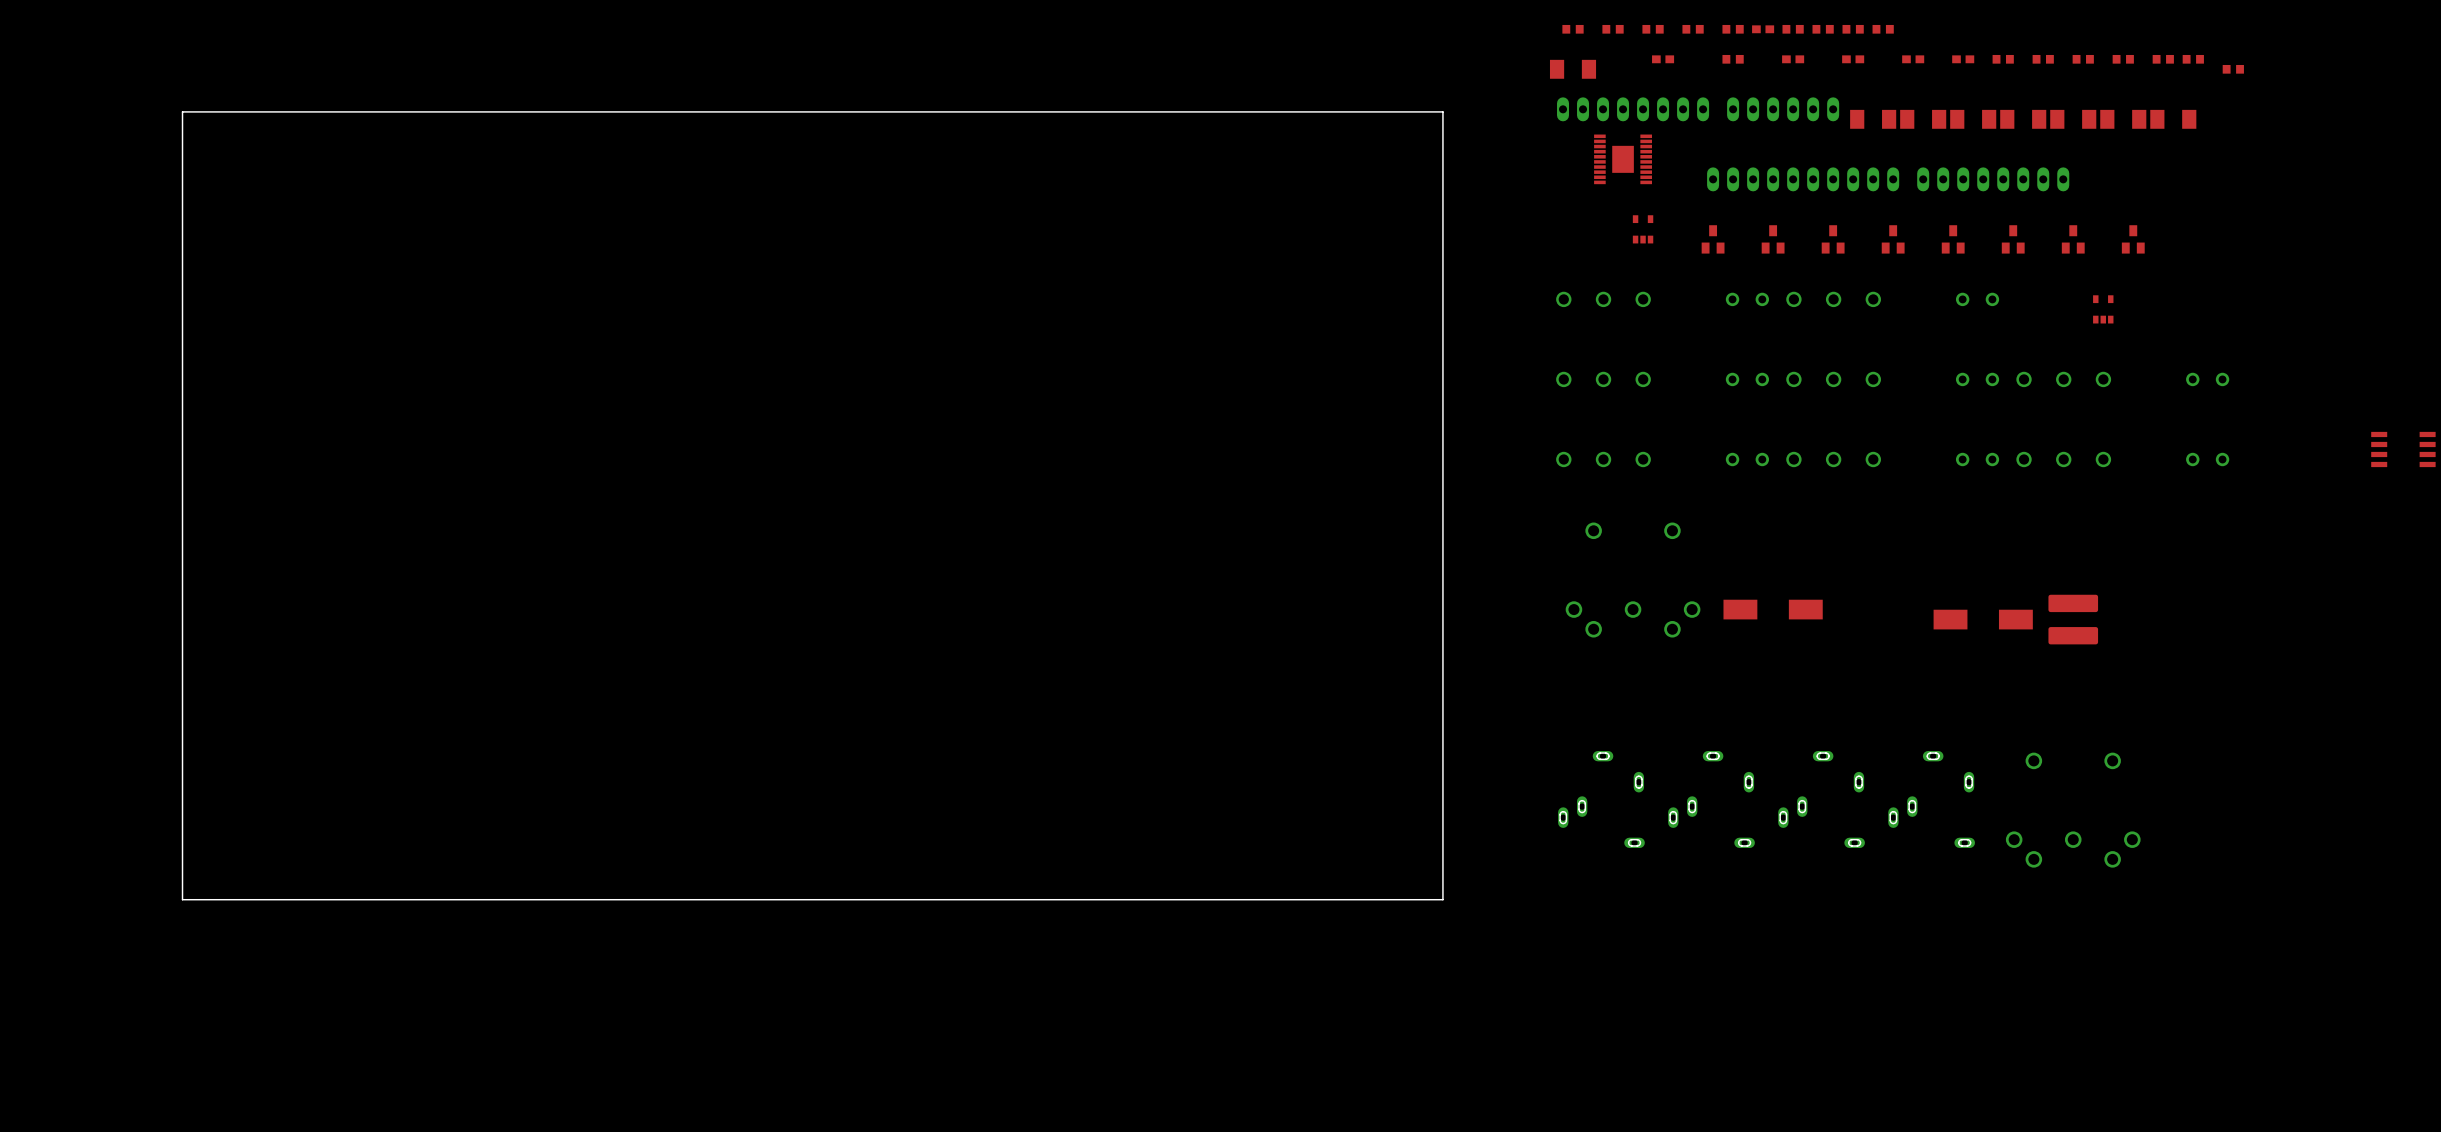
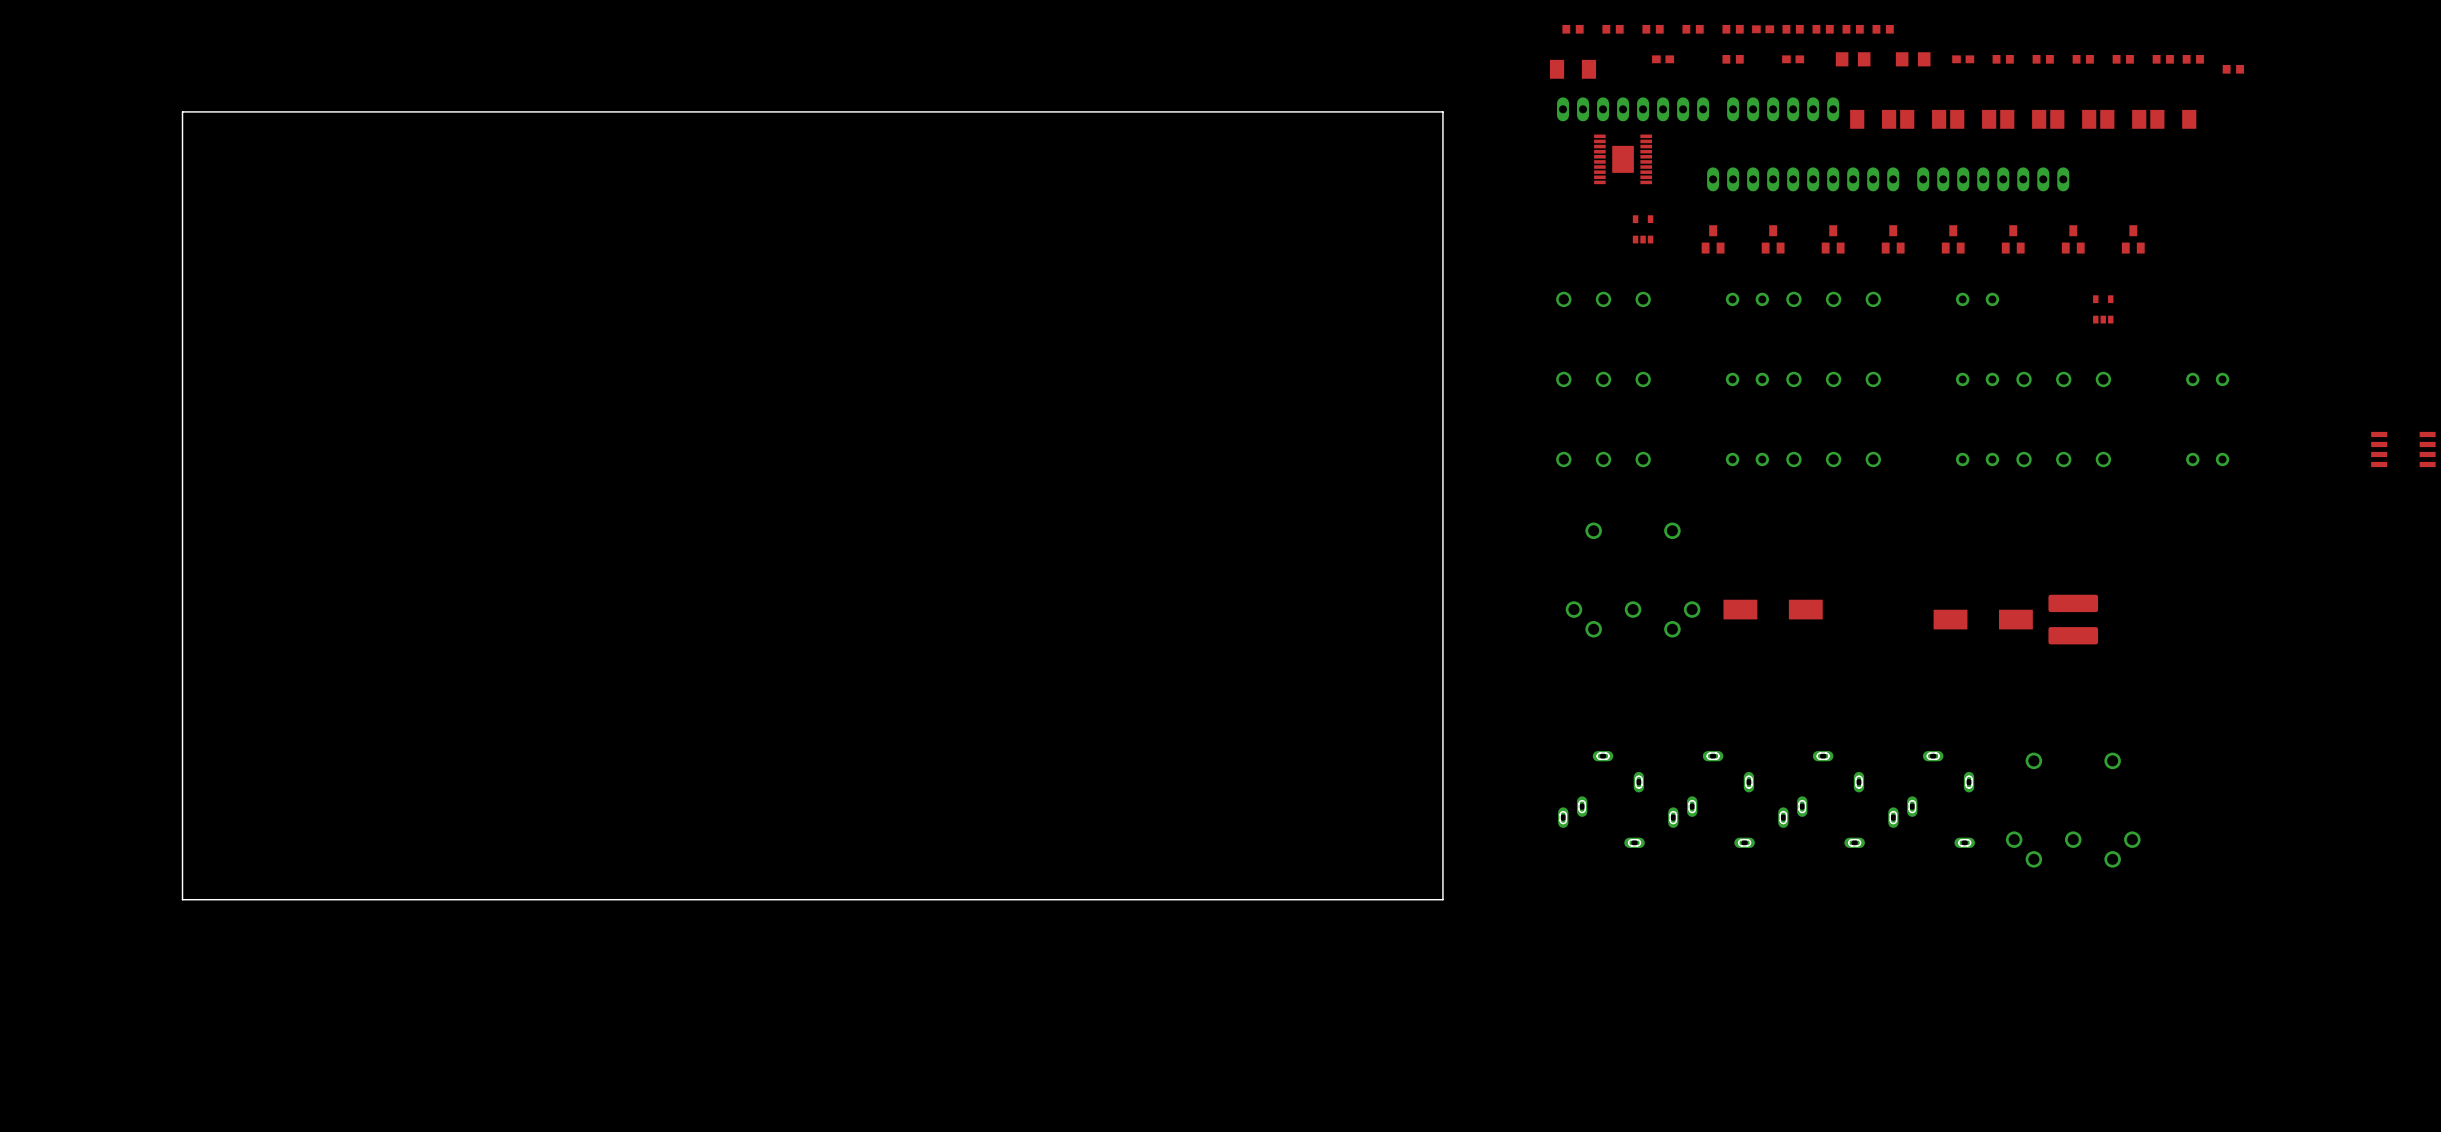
part footprint: [1842, 55, 1865, 64] -> [1835, 52, 1871, 67]
part footprint: [1902, 55, 1925, 64] -> [1895, 52, 1931, 67]

